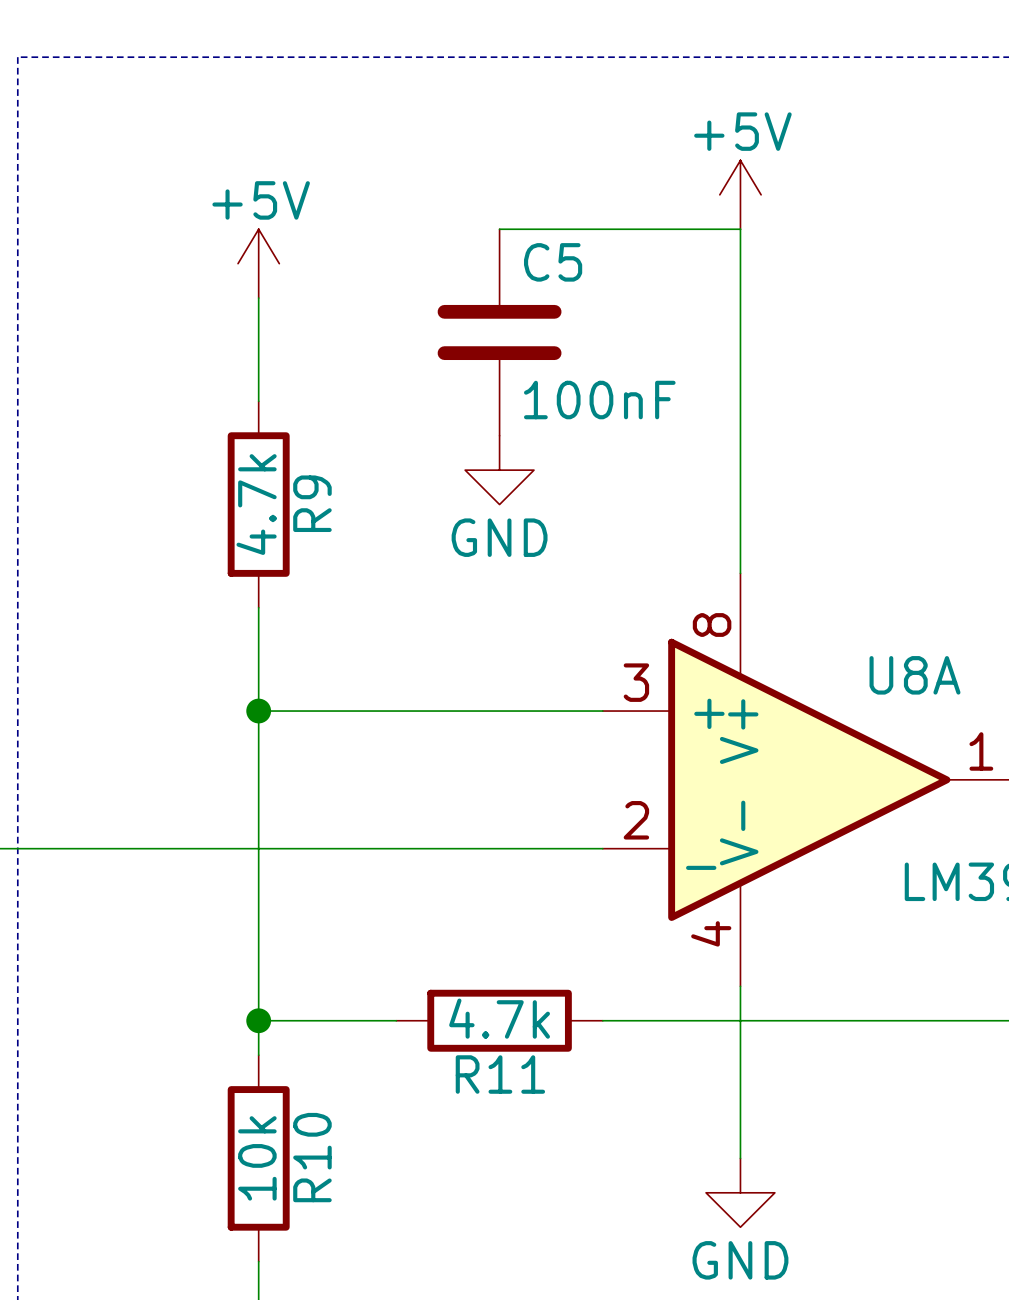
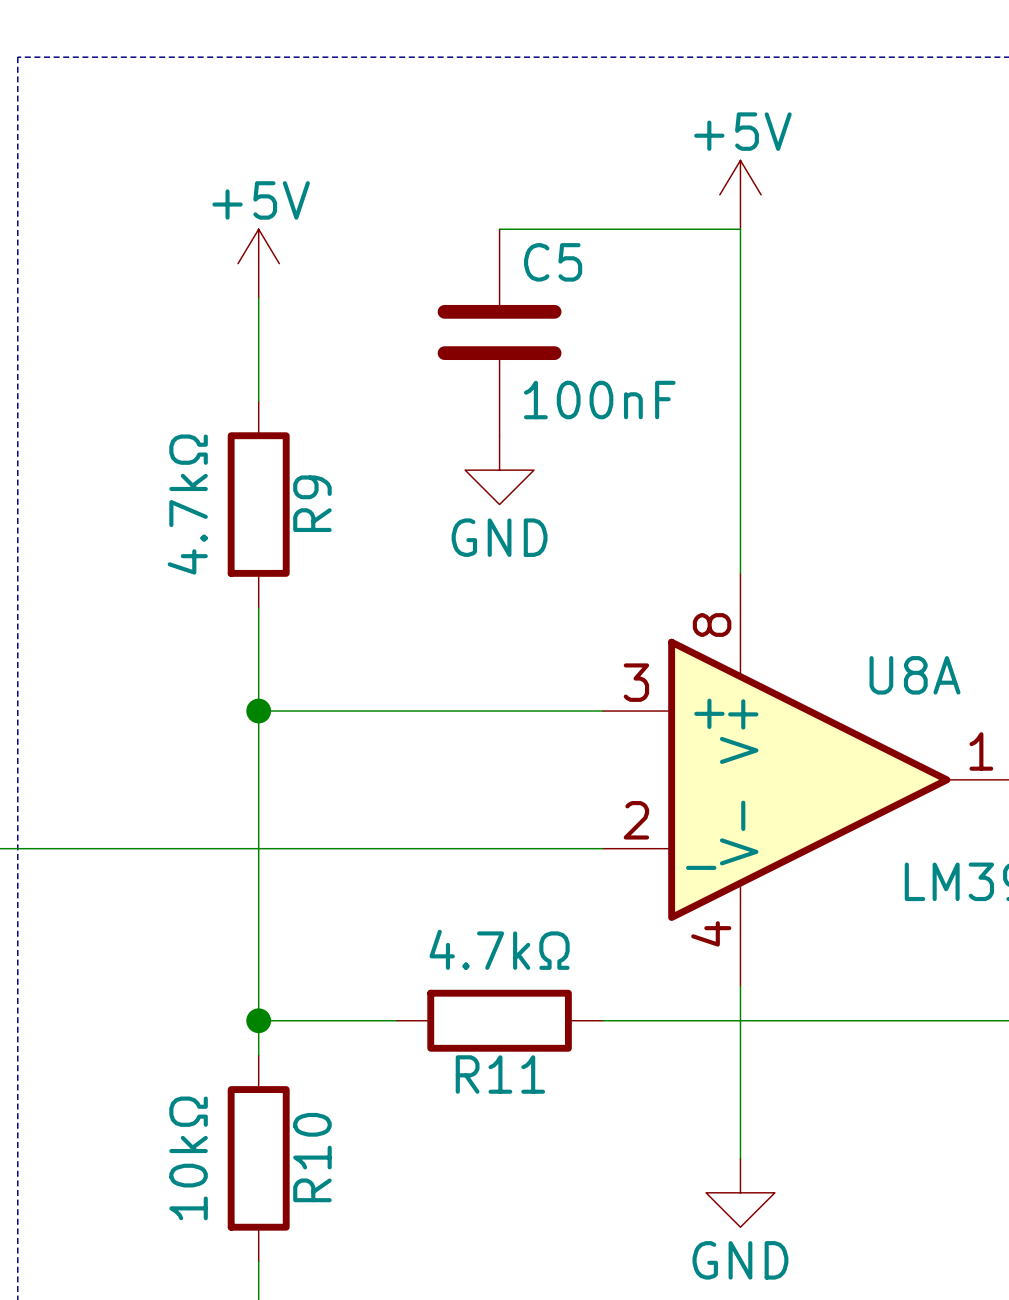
R9 value: 4.7k (256, 504) -> 4.7kΩ (187, 504)
R11 value: 4.7k (499, 1018) -> 4.7kΩ (499, 949)
R10 value: 10k (257, 1158) -> 10kΩ (188, 1158)

